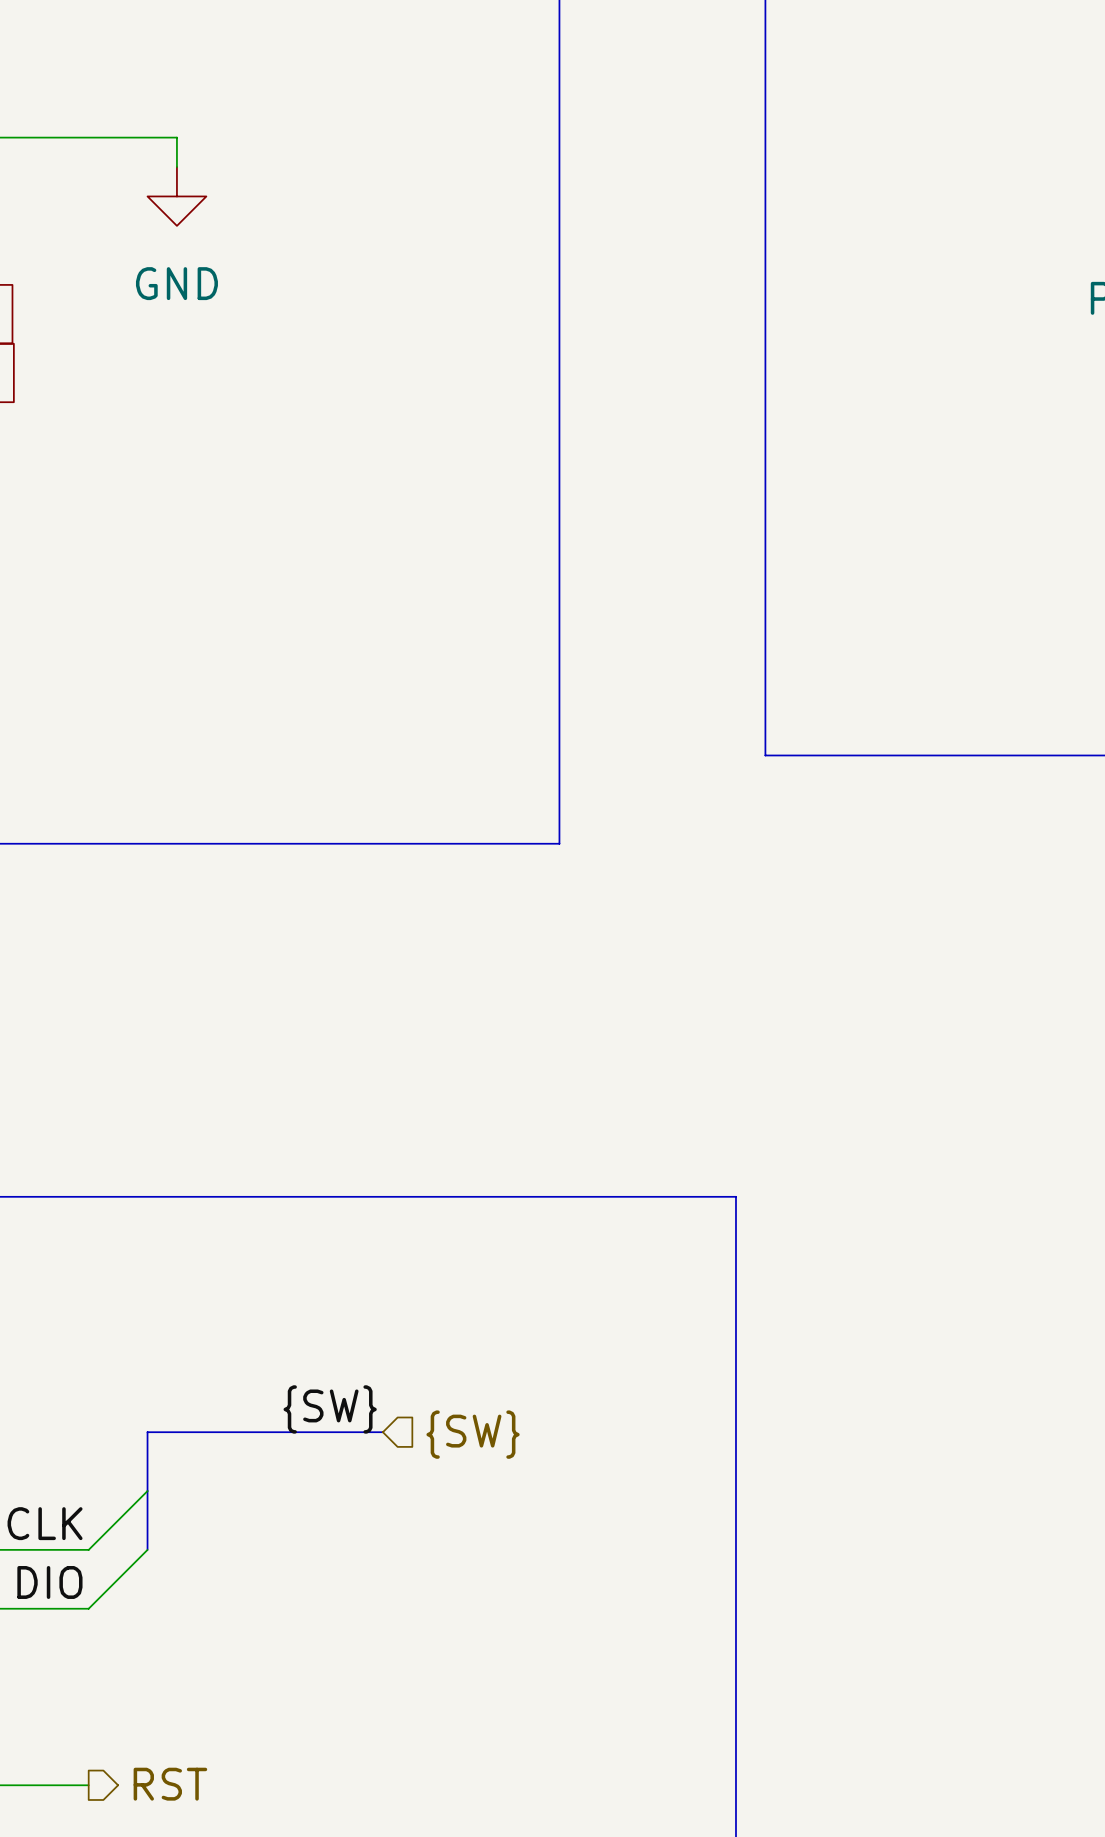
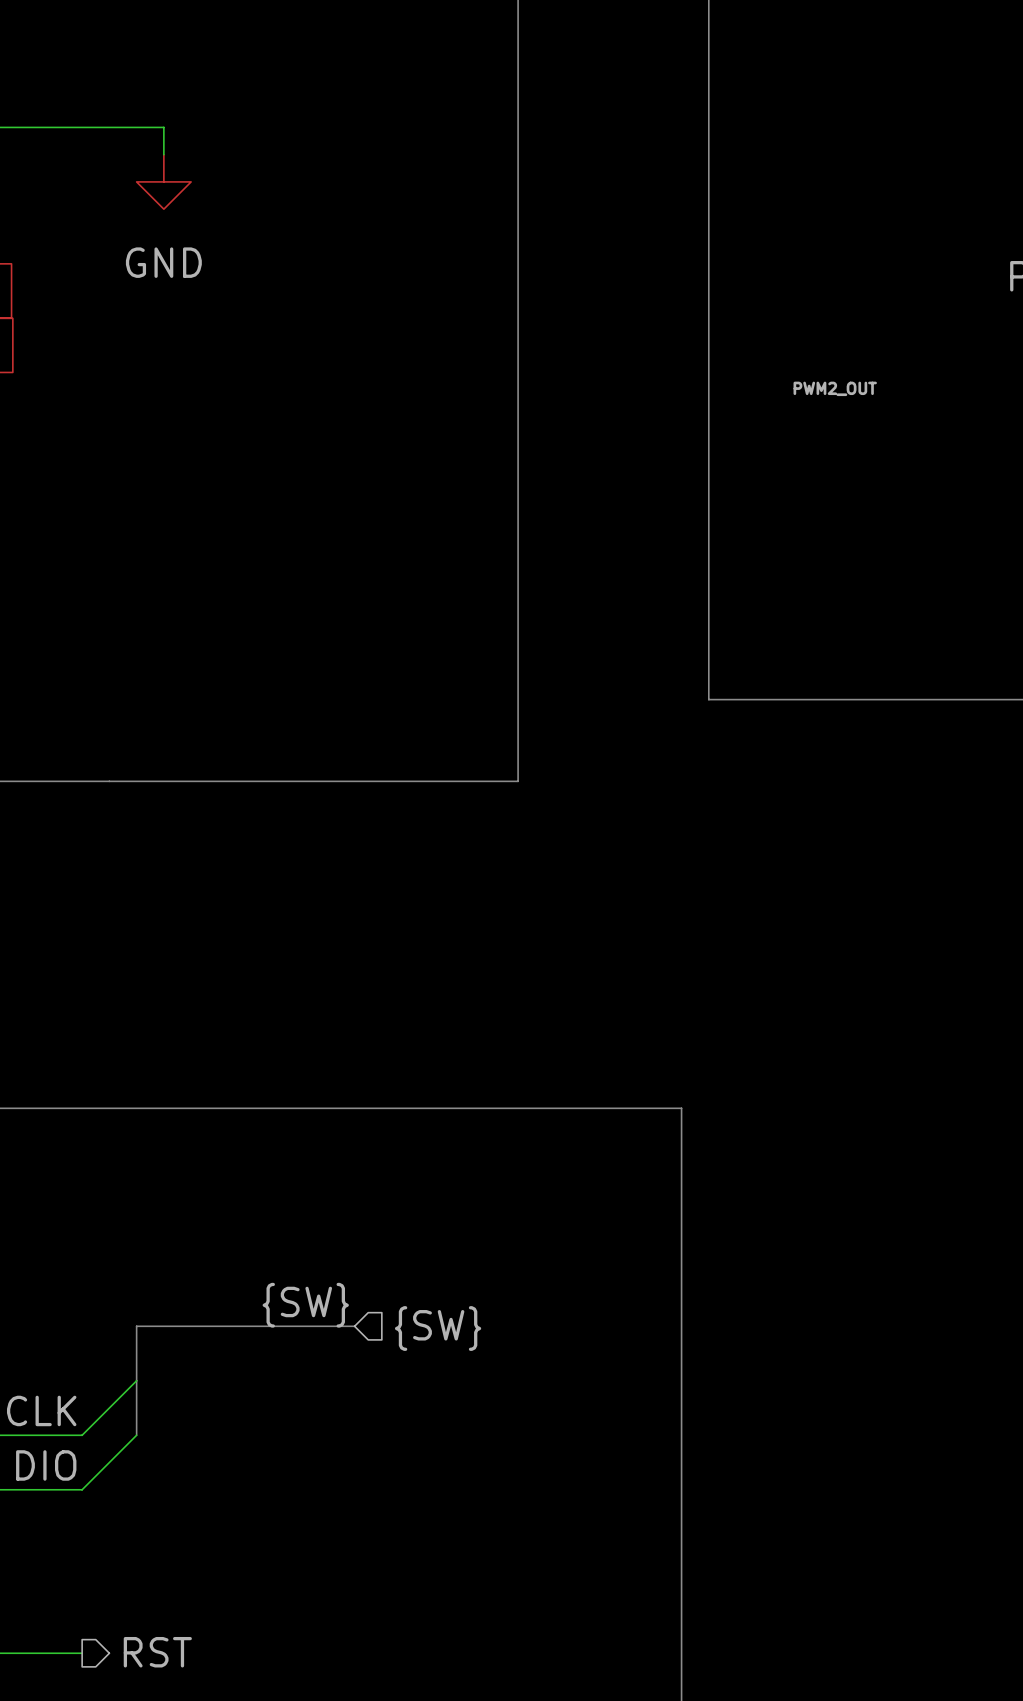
label: none -> PWM2_OUT (835, 388)

